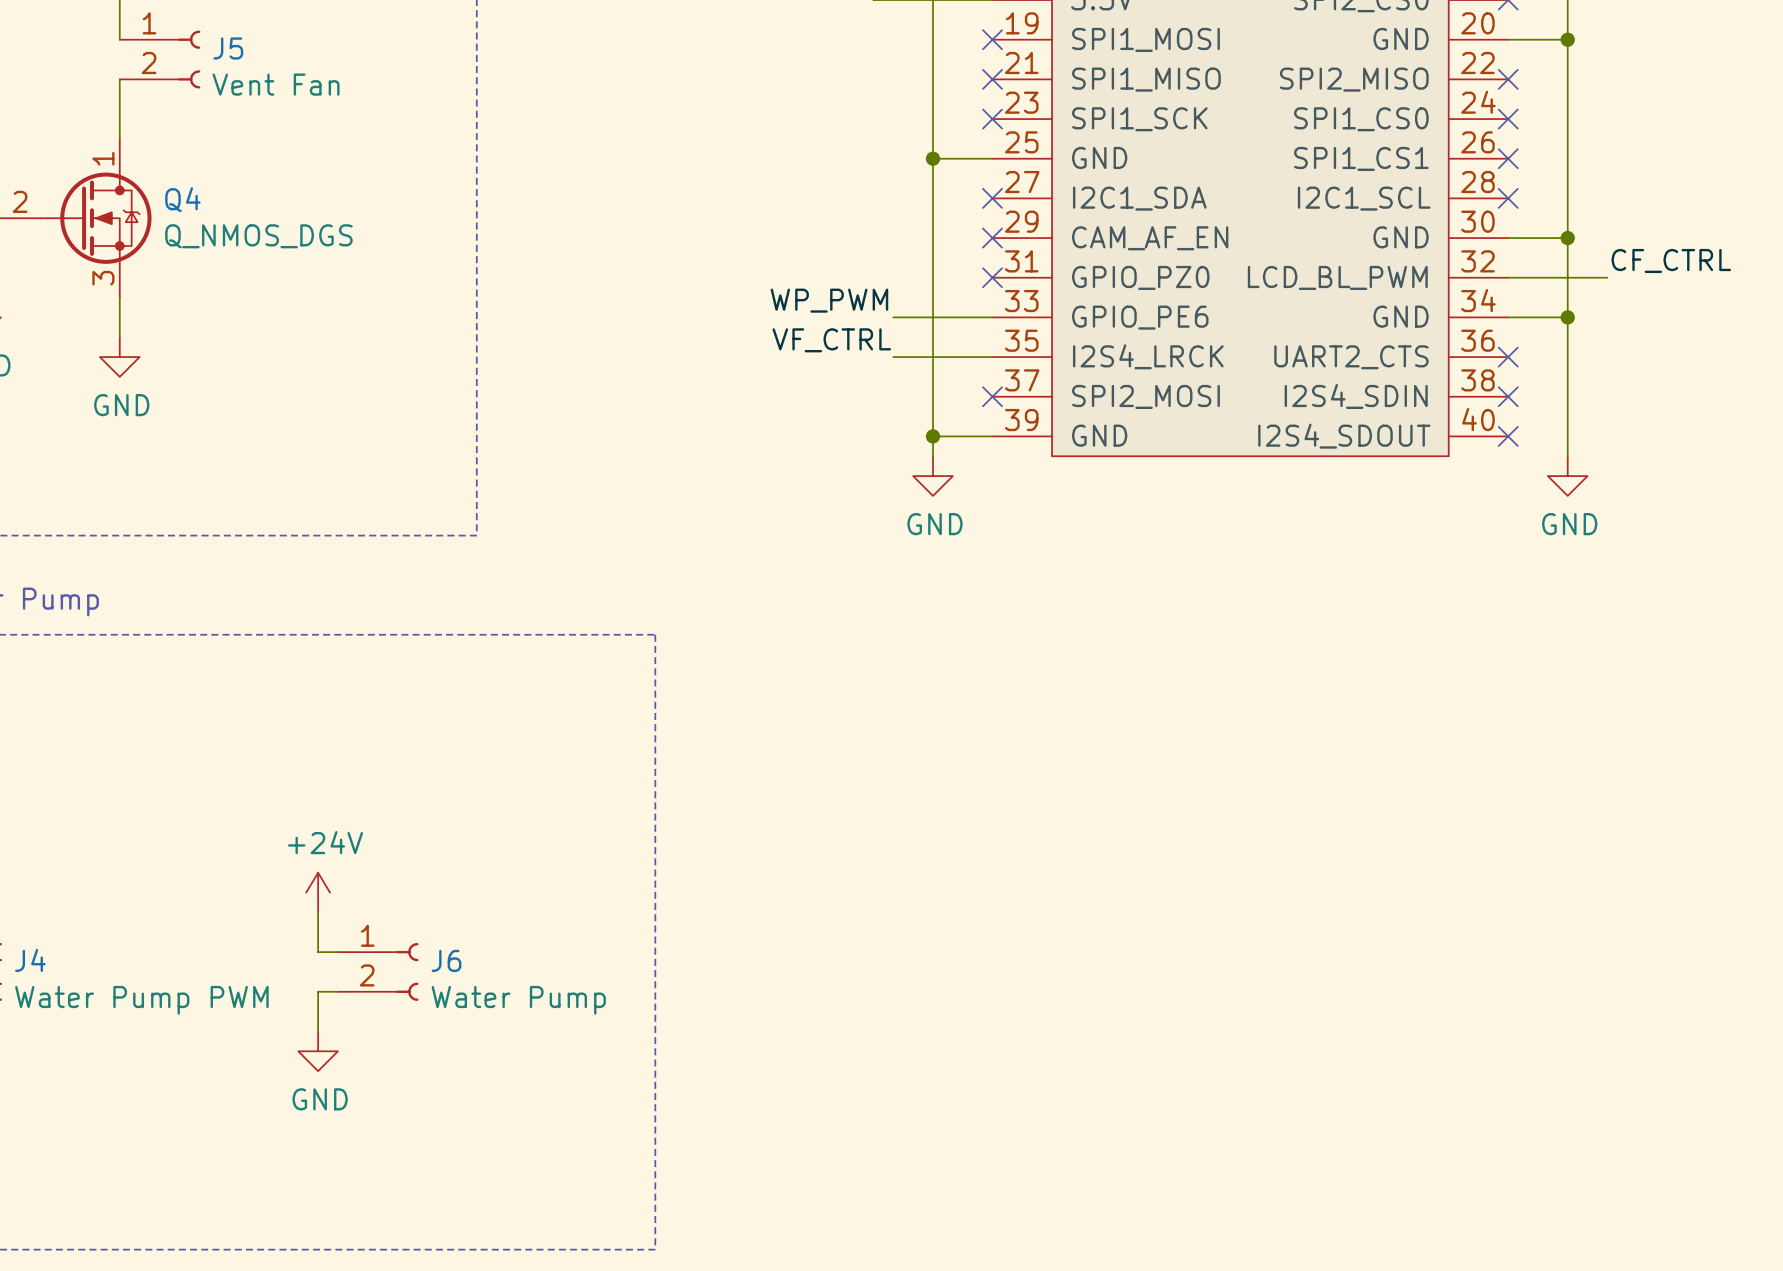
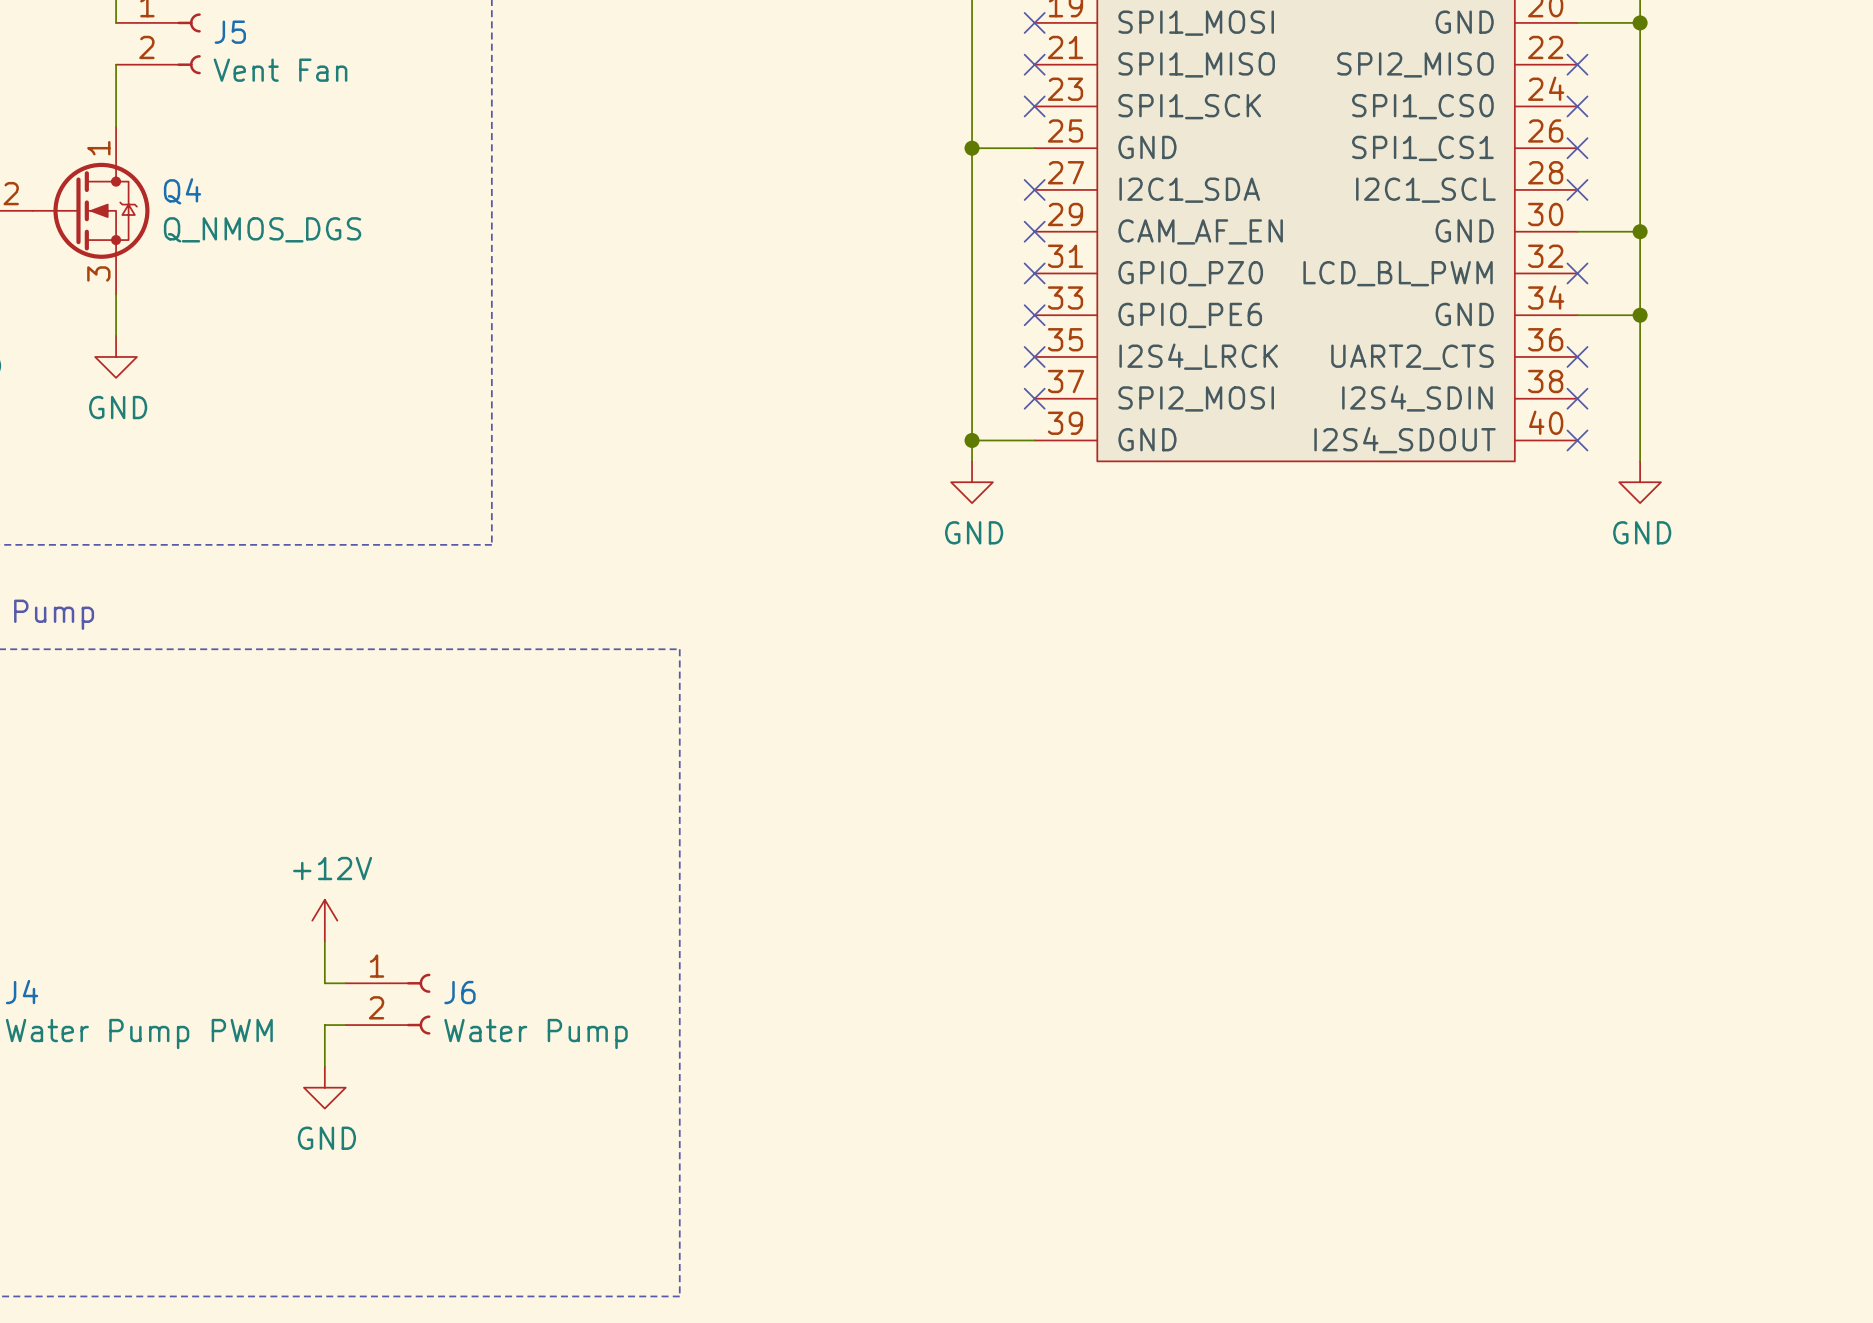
label: CF_CTRL (1671, 260) -> none
wire: (1508, 277) (1607, 277) -> none
no-connect mark: none -> (1577, 273)
label: WP_PWM (829, 300) -> none
wire: (893, 317) (992, 317) -> none
no-connect mark: none -> (1034, 315)
label: VF_CTRL (831, 340) -> none
wire: (893, 357) (992, 357) -> none
no-connect mark: none -> (1034, 356)
power symbol: +24V (318, 892) -> +12V (324, 920)

